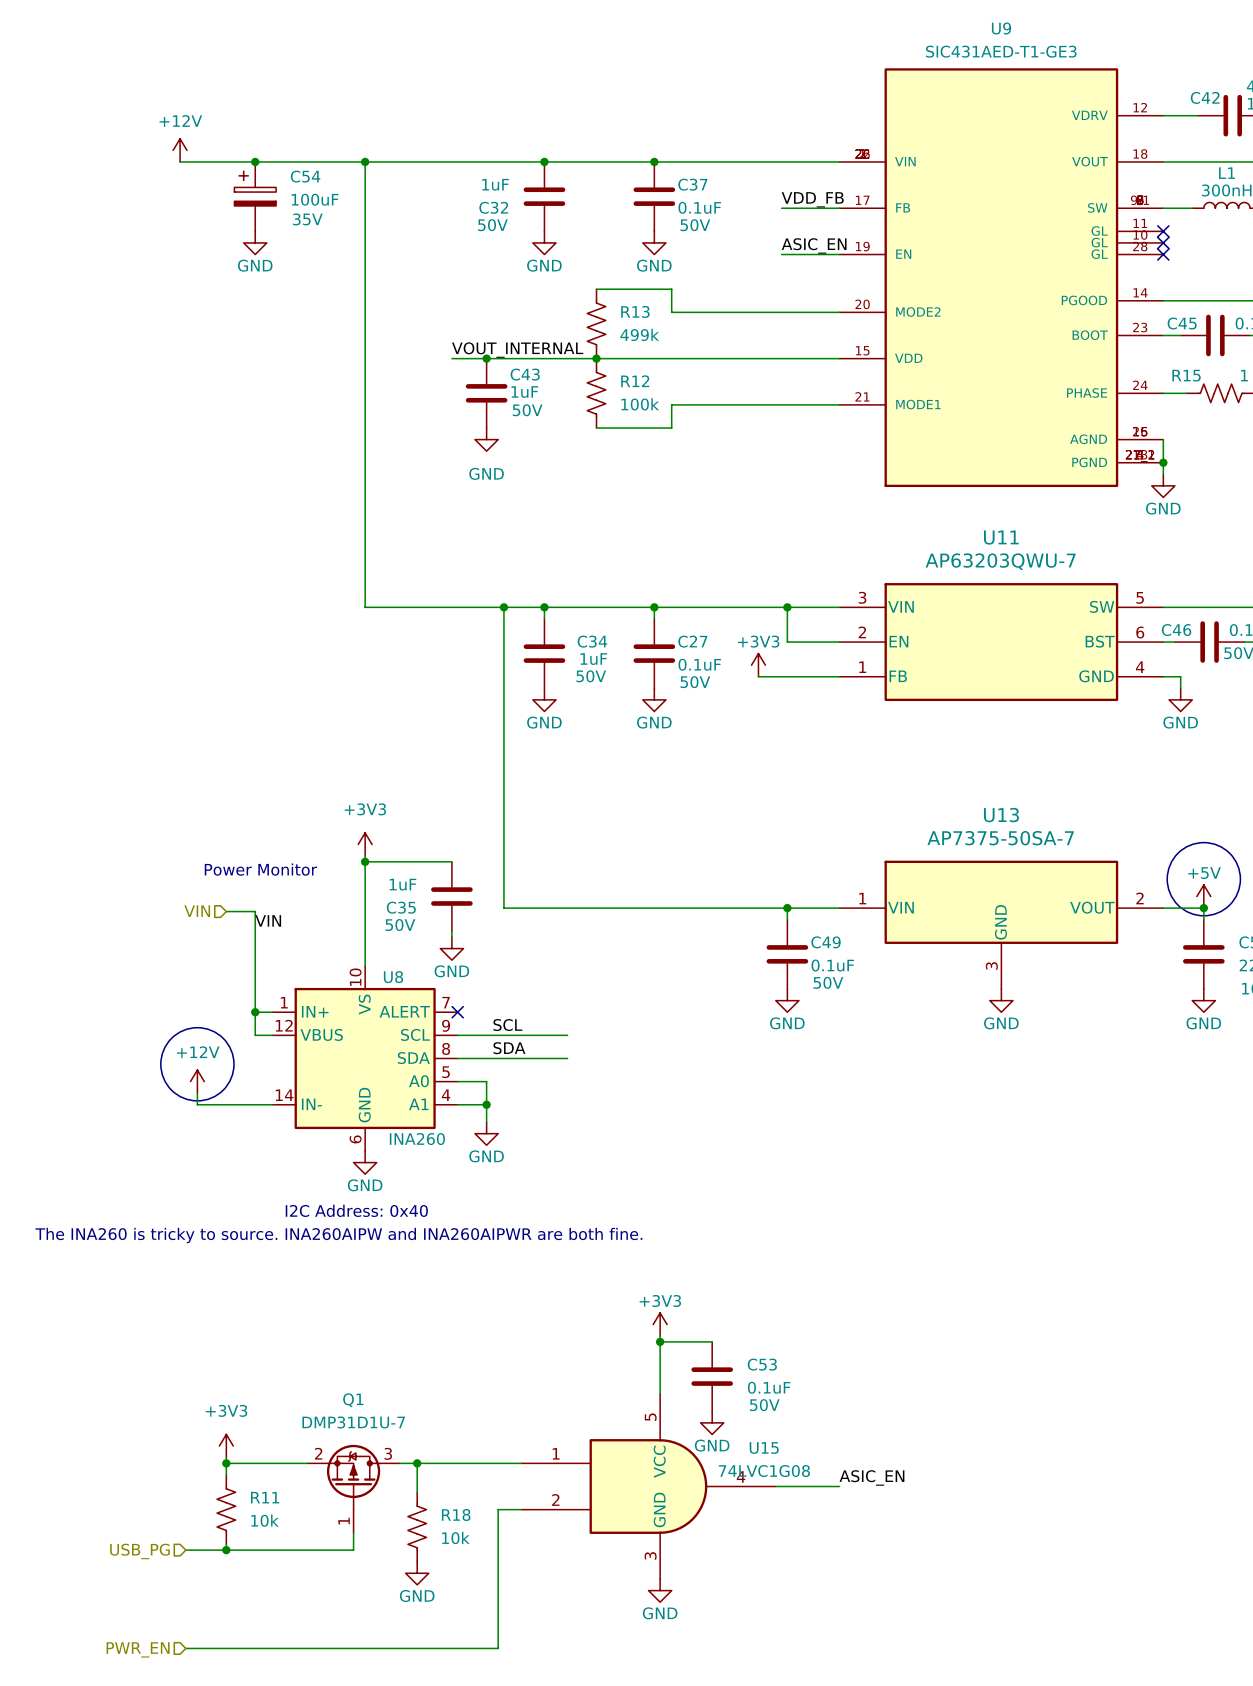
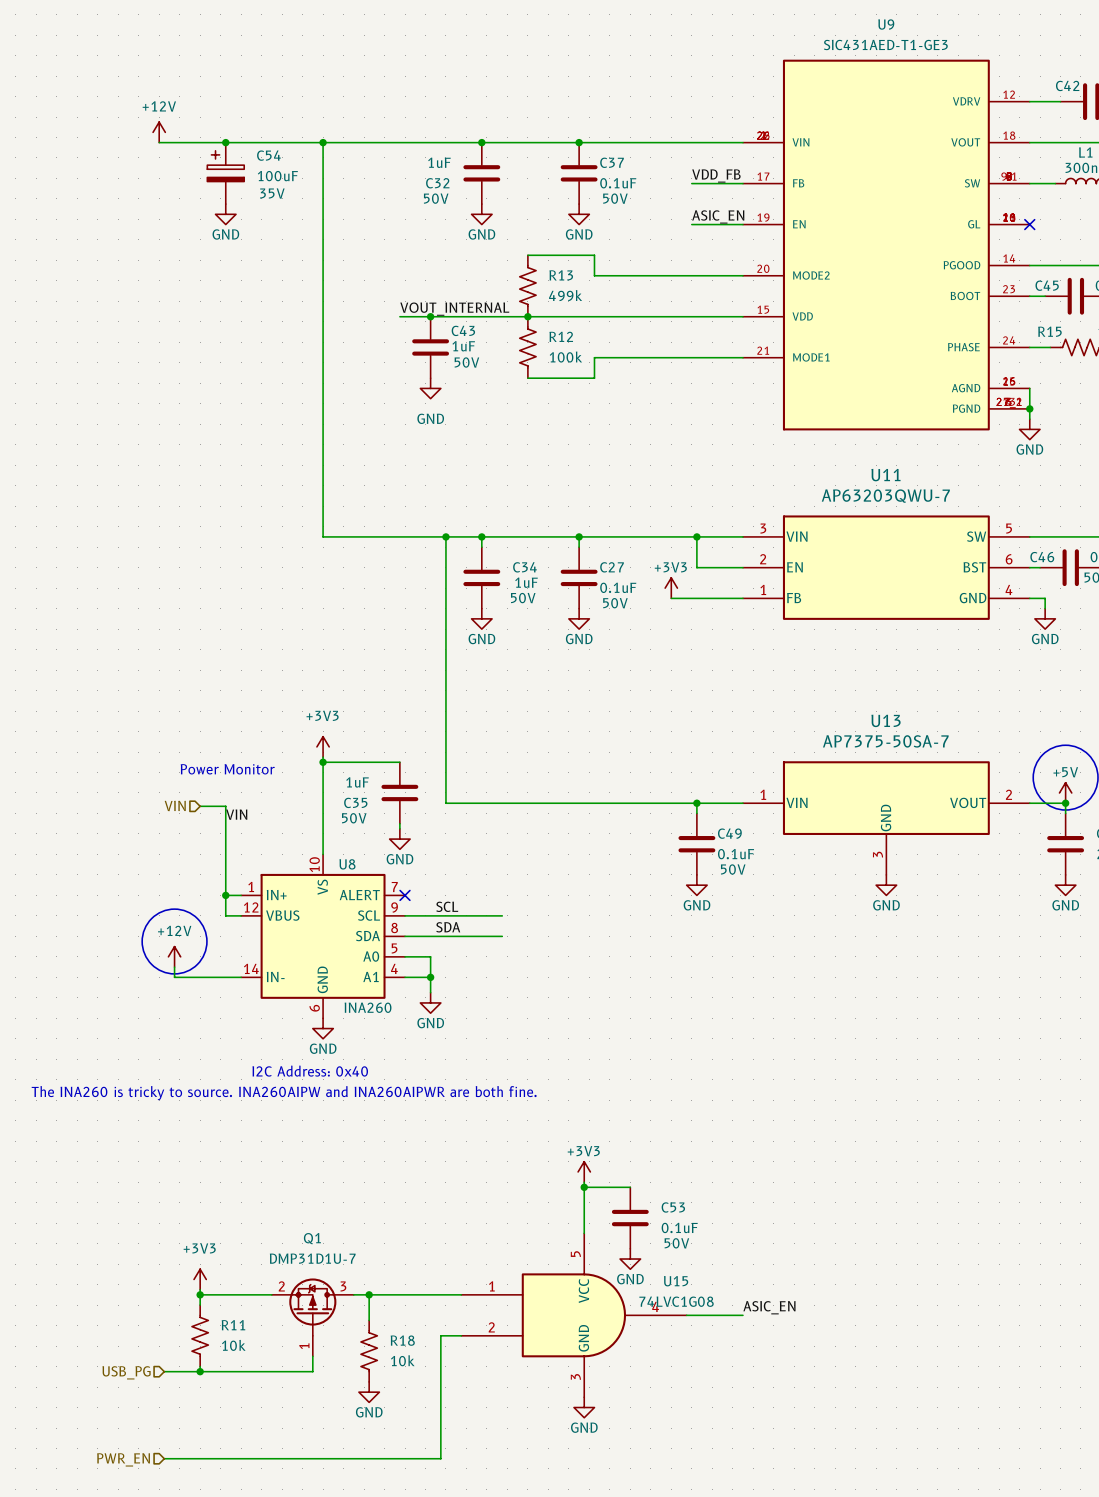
U9 symbol: [839, 68, 1164, 488] -> [742, 59, 1030, 431]
no-connect mark: (1163, 231) -> none
no-connect mark: (1163, 242) -> none

